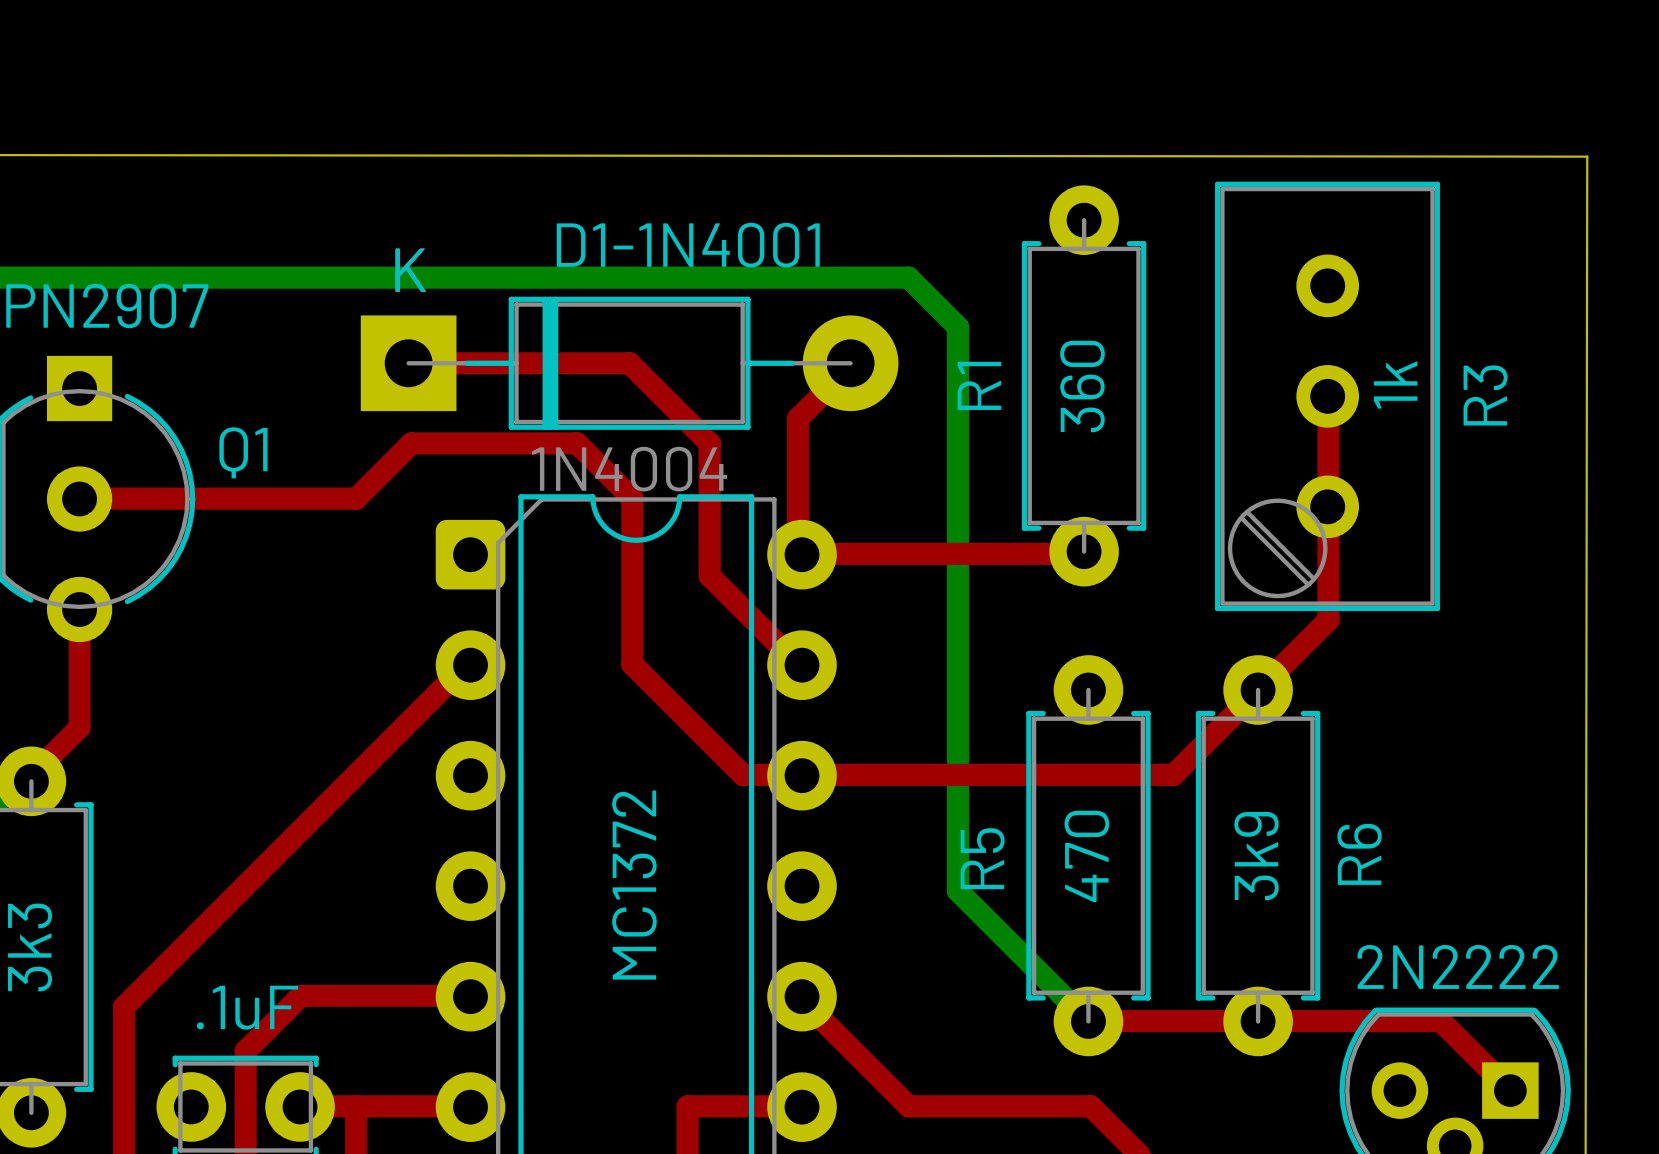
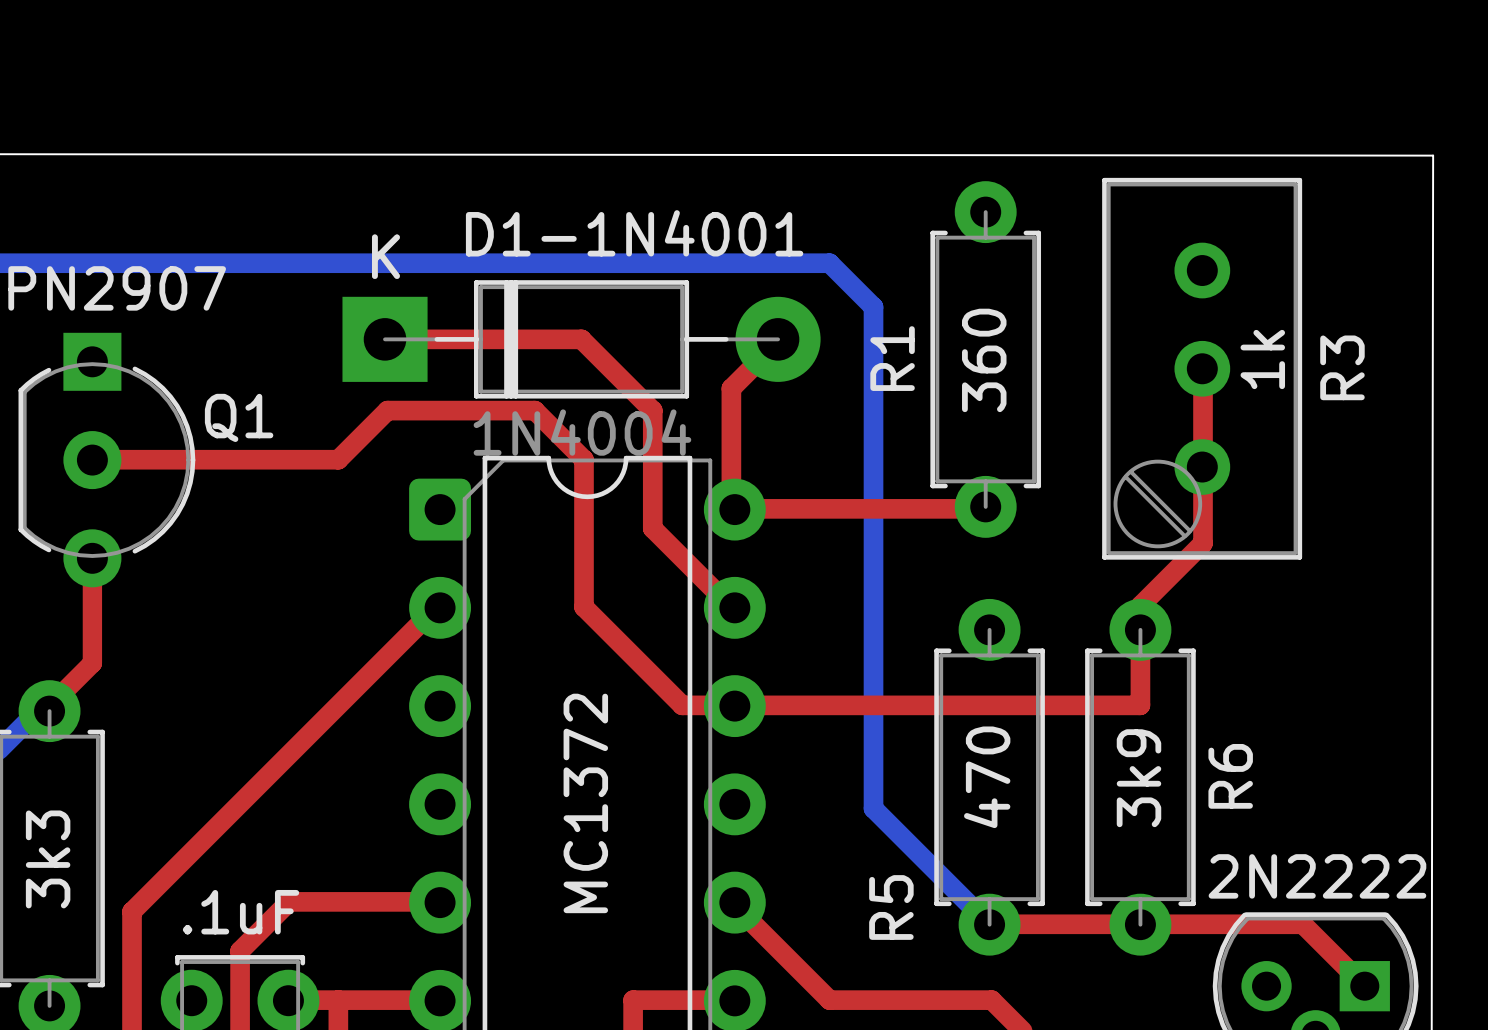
top track: (1328, 592) (1328, 620) (1173, 774) -> (1203, 543) (1140, 605) (1140, 705)
top track: none -> (1065, 705) (1140, 705)
R5 name position: R5 (982, 858) -> R5 (891, 907)

